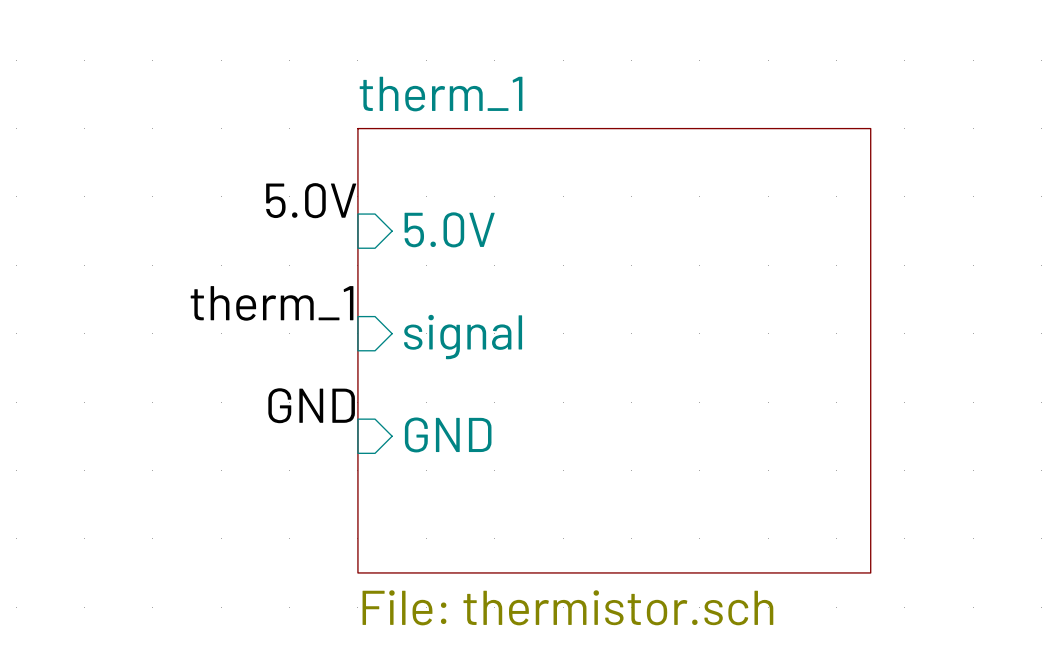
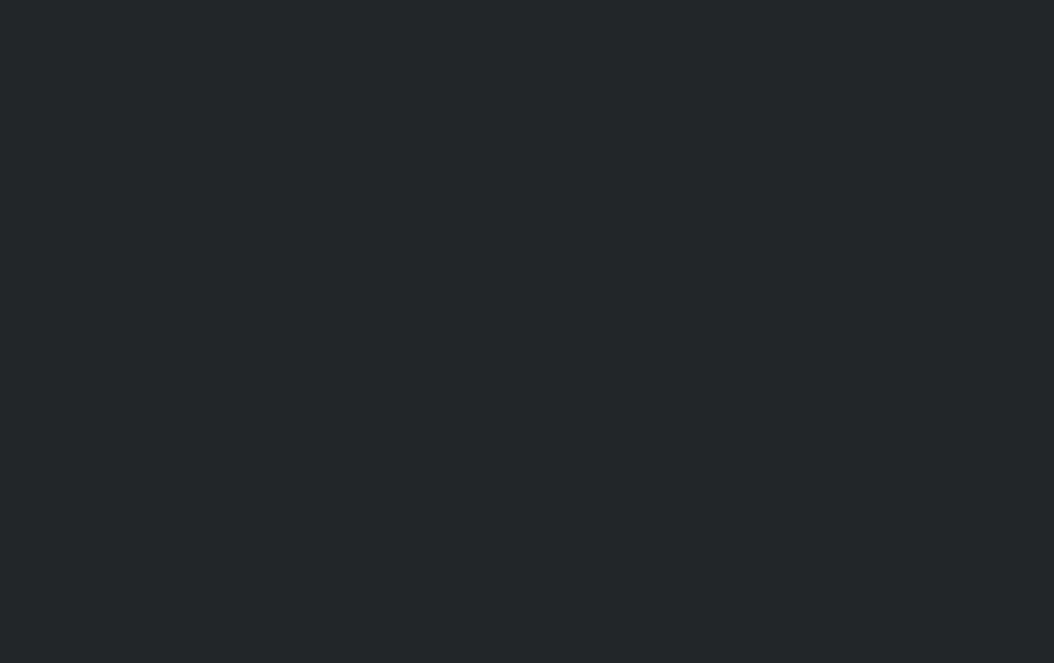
label: 5.0V (311, 200) -> none
sheet pin: 5.0V (449, 229) -> none
label: therm_1 (272, 303) -> none
sheet pin: signal (463, 337) -> none
sheet therm_1: File: thermistor.sch (614, 350) -> none
label: GND (311, 405) -> none
sheet pin: GND (448, 434) -> none

